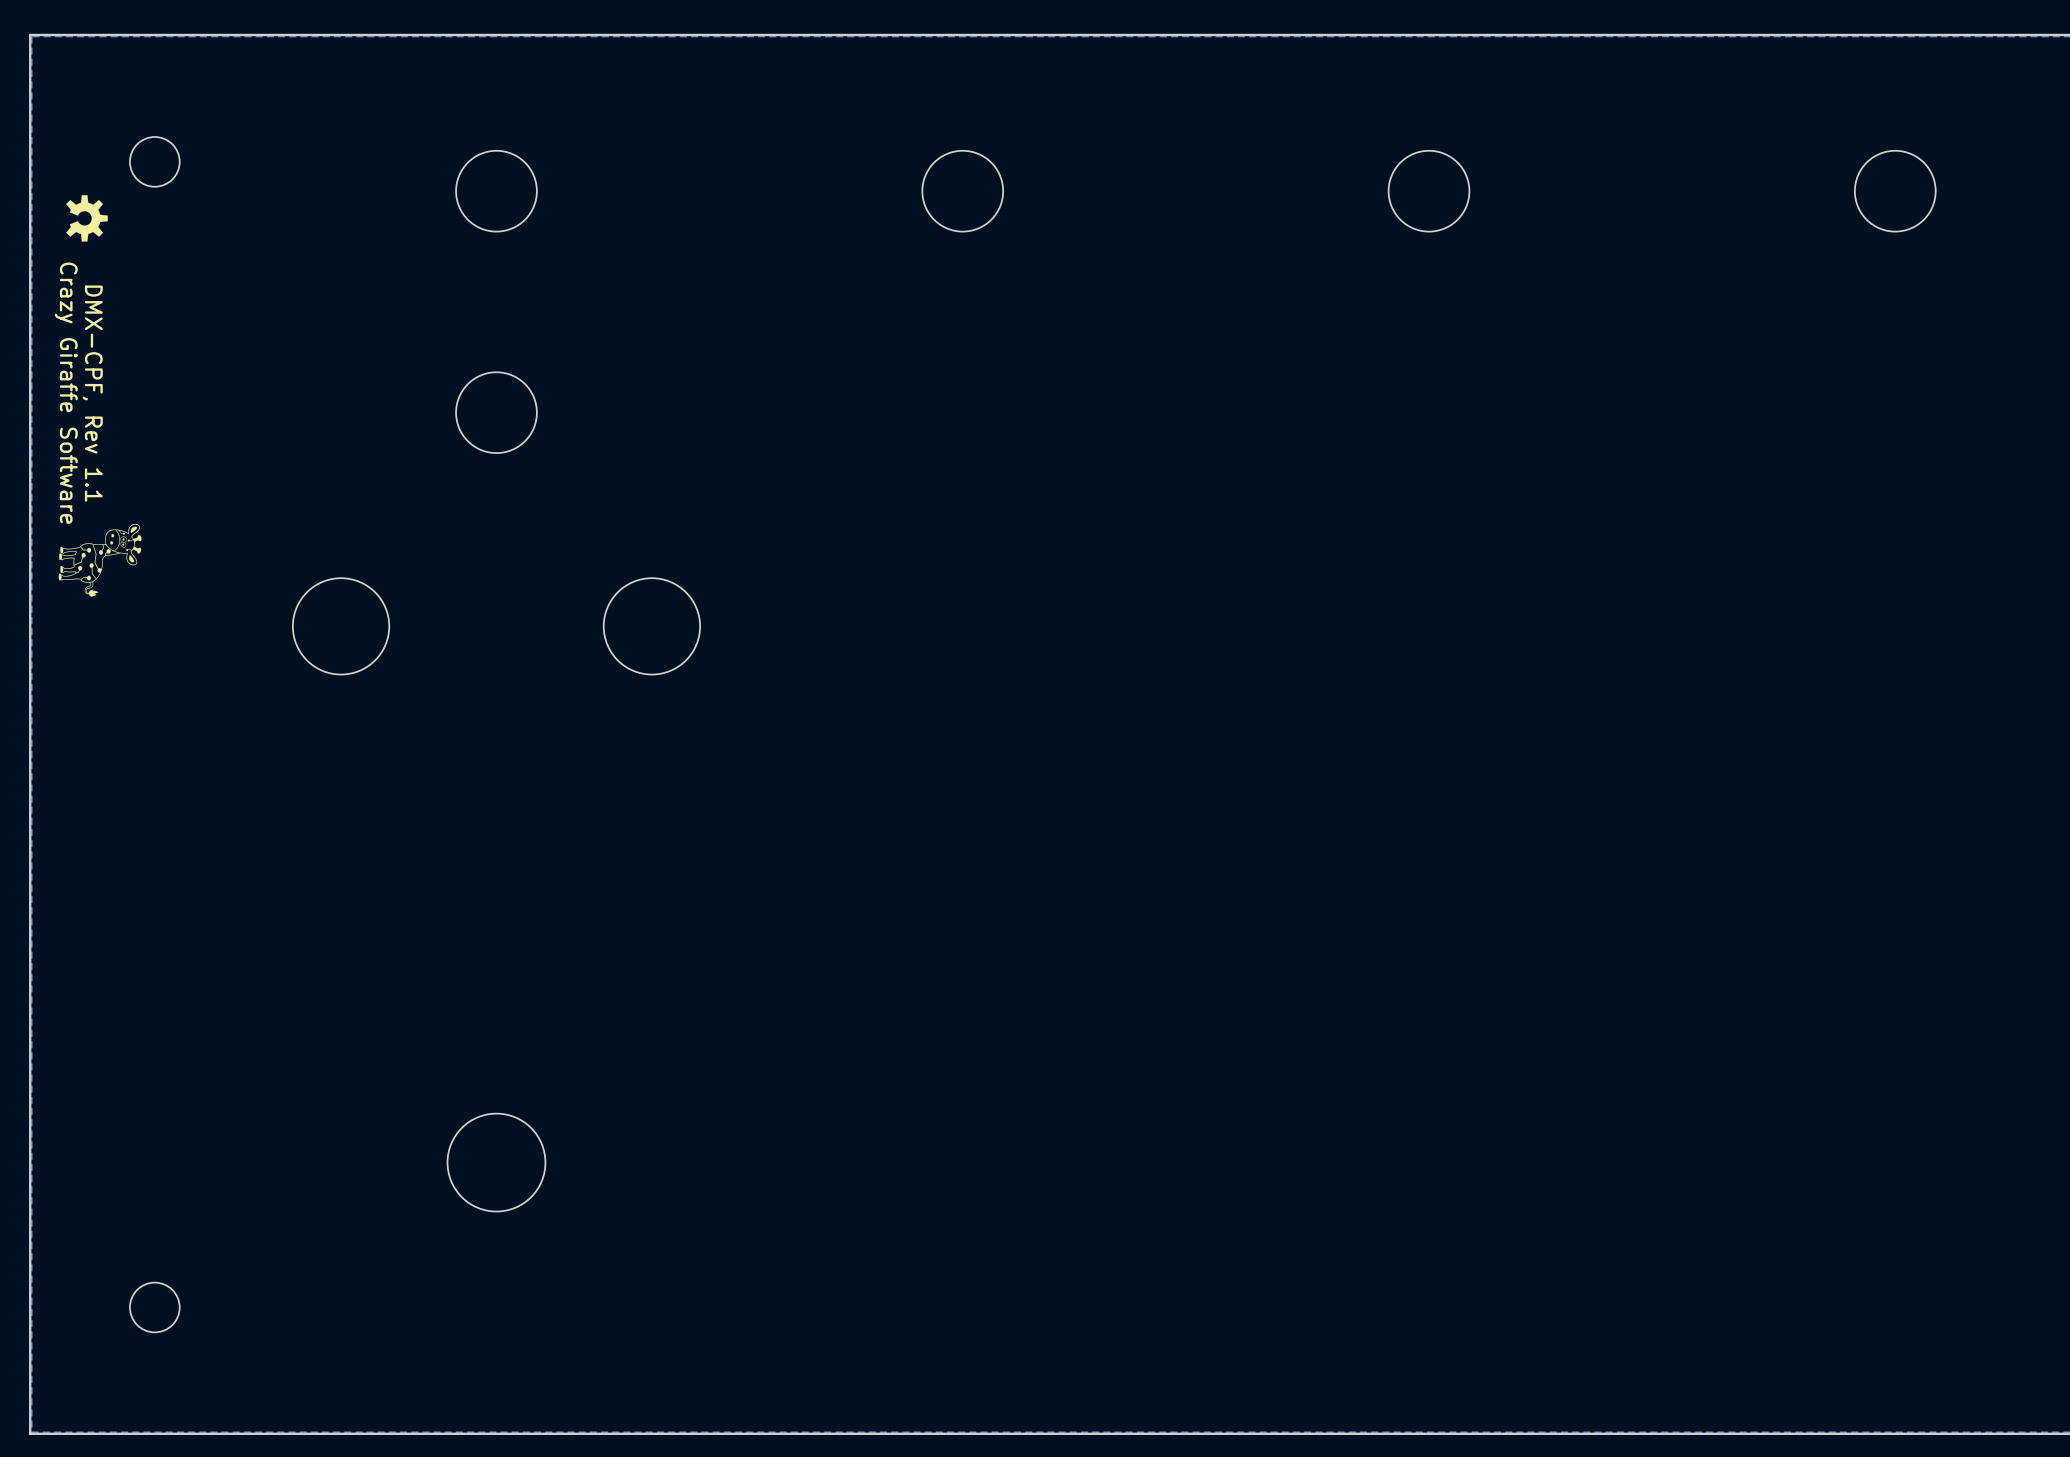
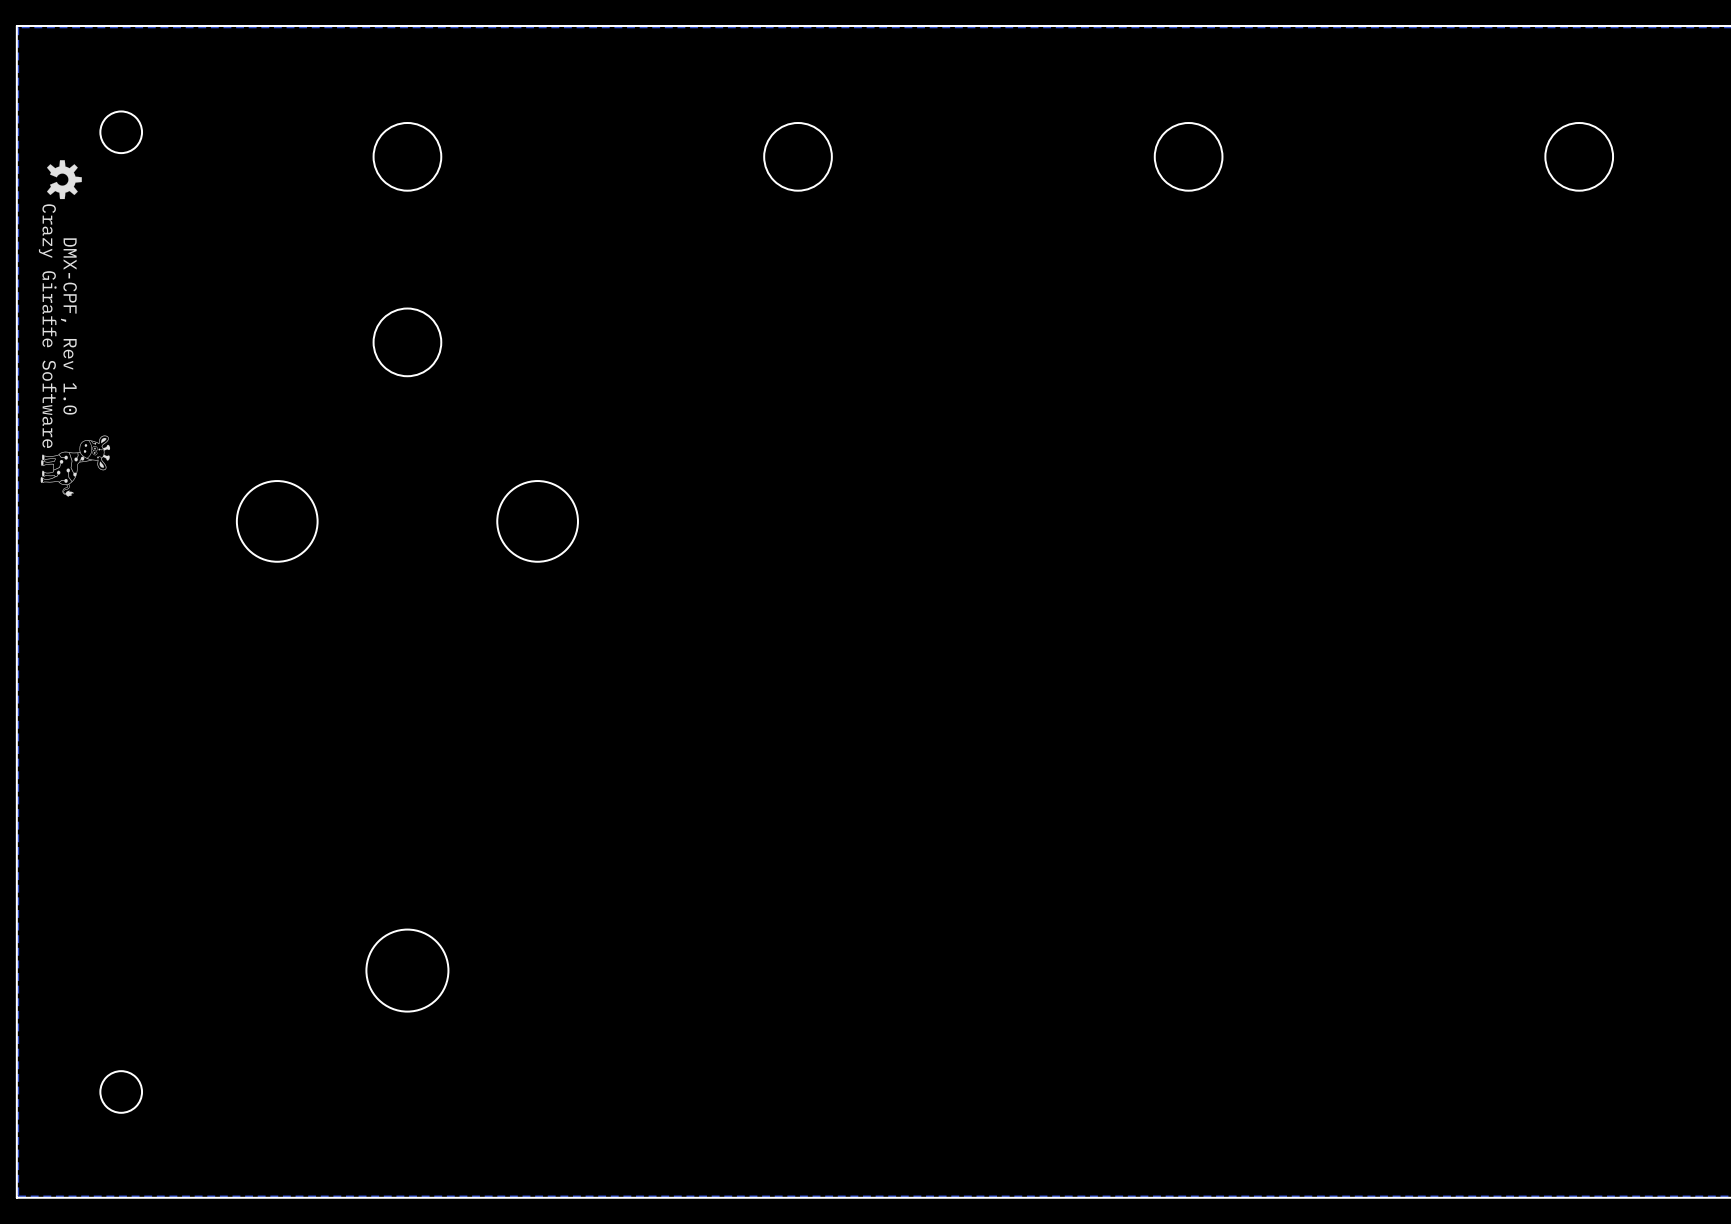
text: DMX-CPF, Rev 1.1 (92, 393) -> DMX-CPF, Rev 1.0 (68, 326)

